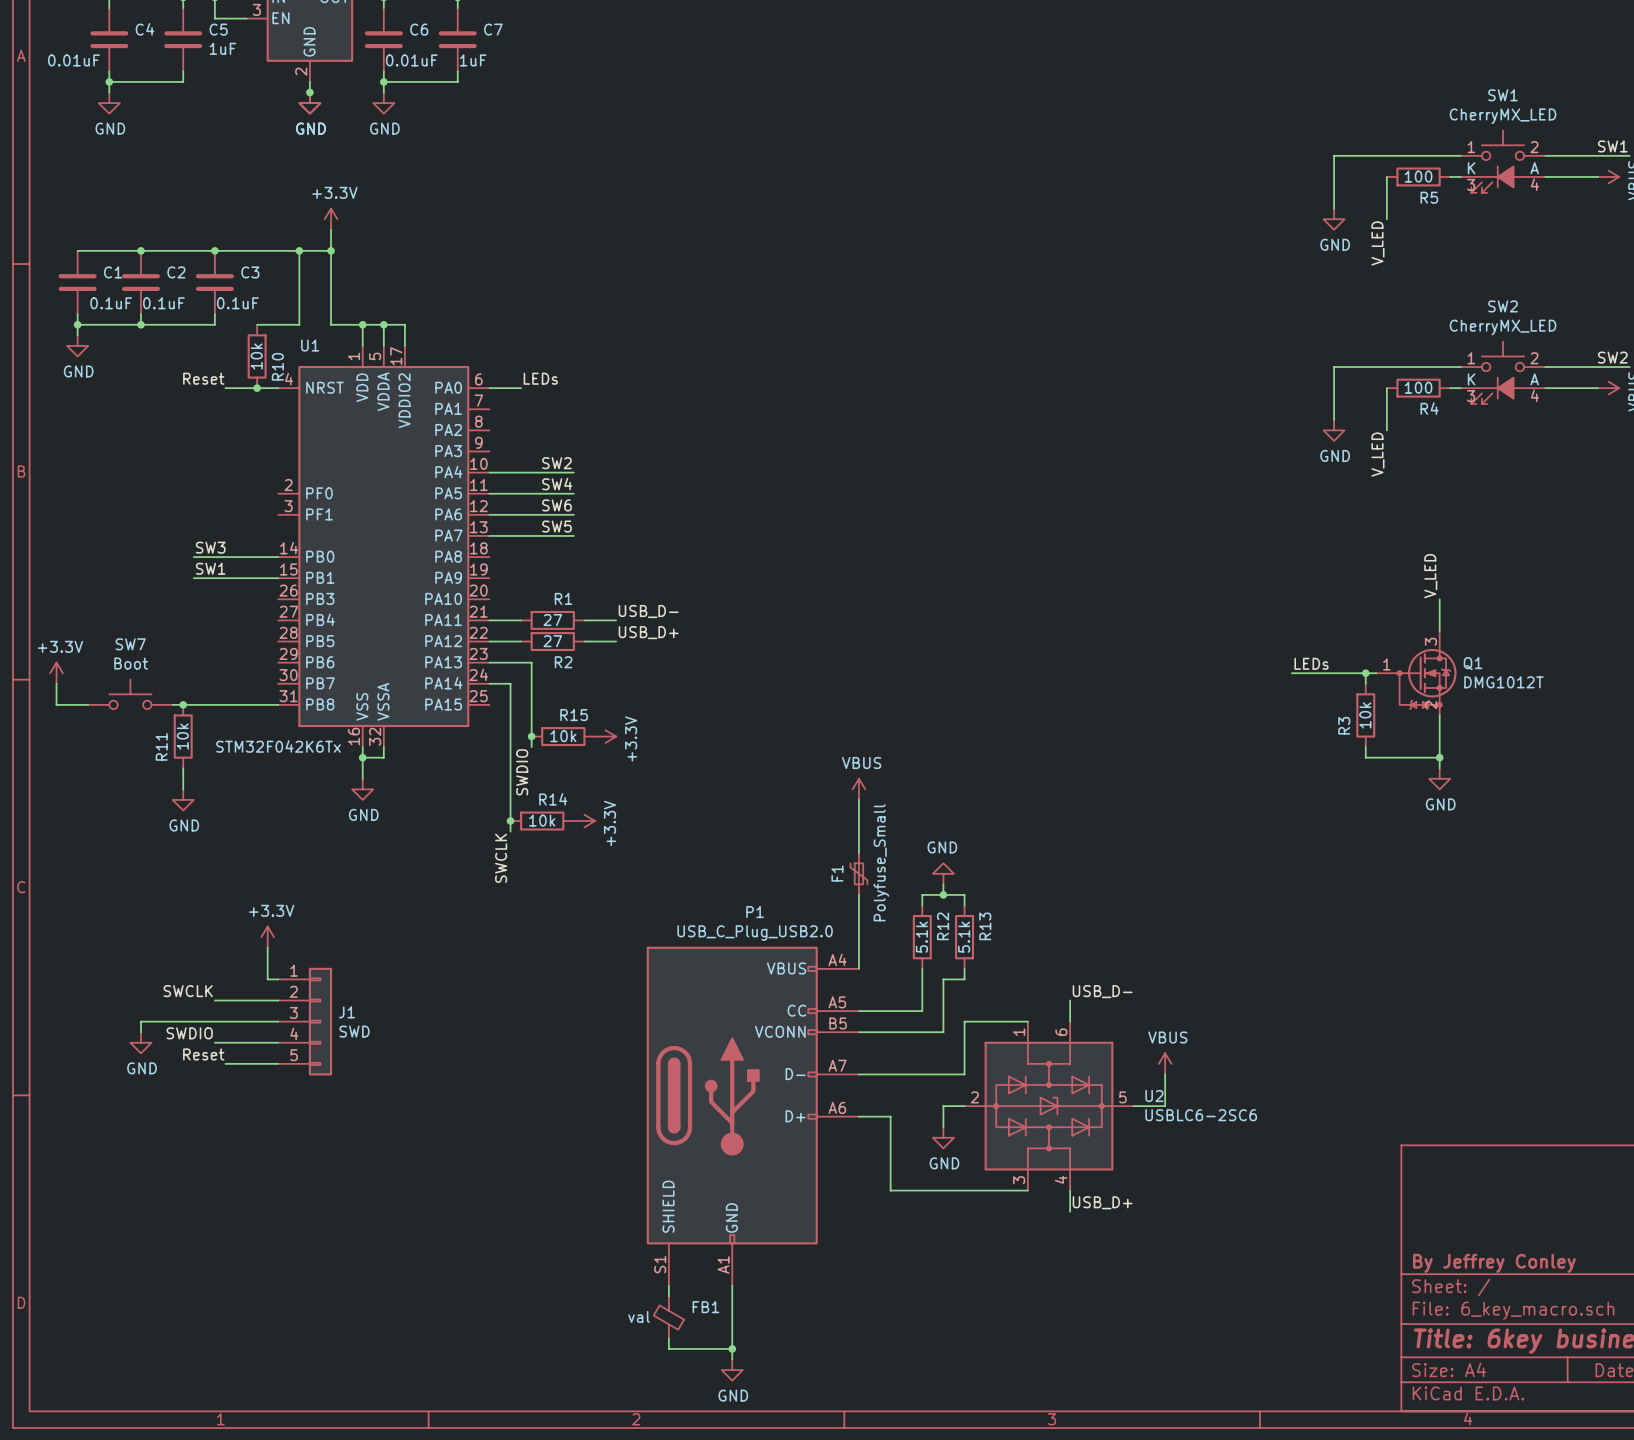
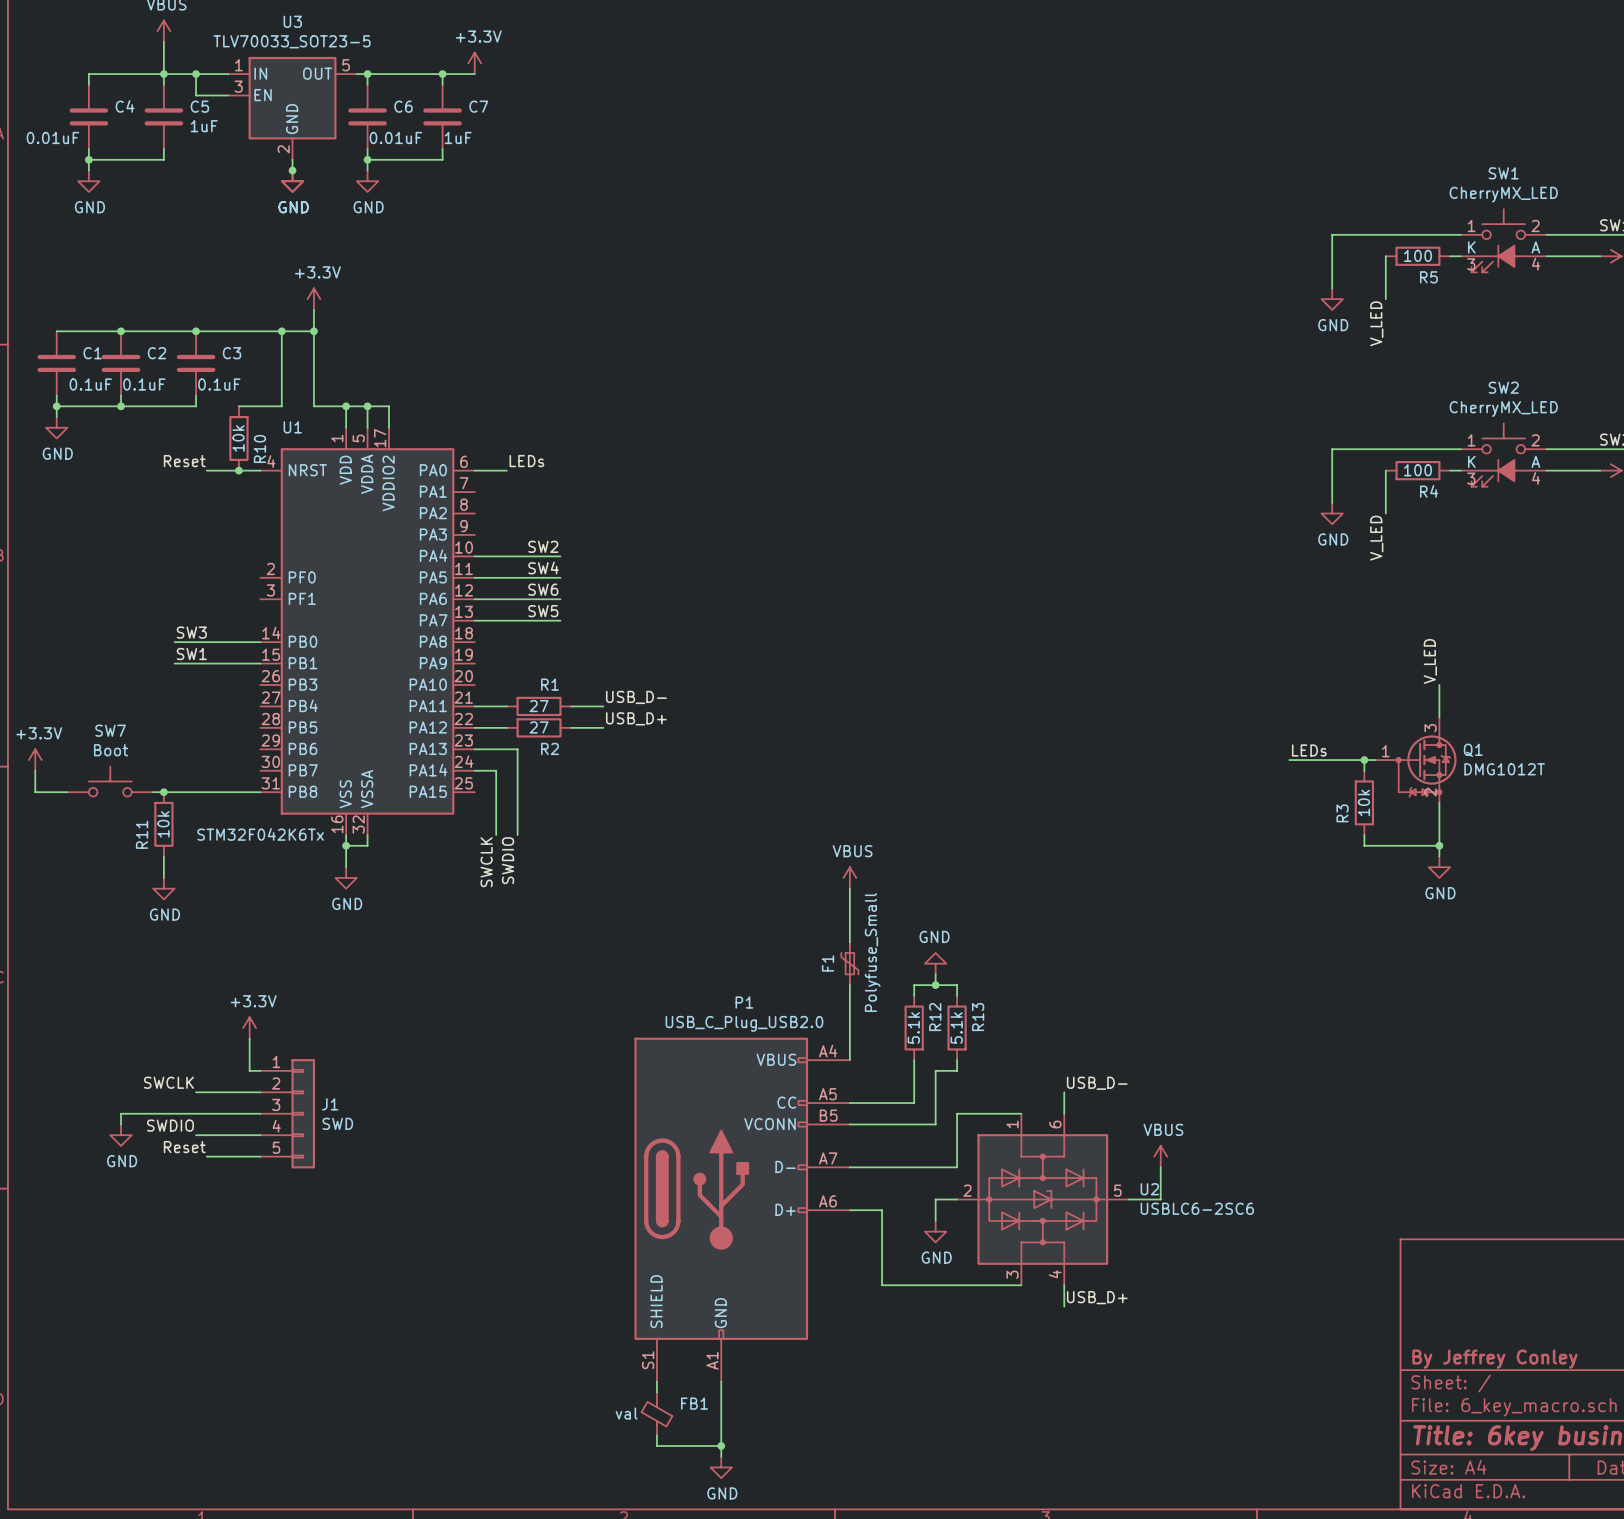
junction: (531, 736) -> none
R15: 10k (563, 736) -> none
power symbol: +3.3V (605, 736) -> none
wire: (510, 747) (510, 831) -> none
junction: (510, 821) -> none
R14: 10k (542, 821) -> none
power symbol: +3.3V (584, 821) -> none
label position: SWCLK (501, 858) -> SWCLK (486, 862)

